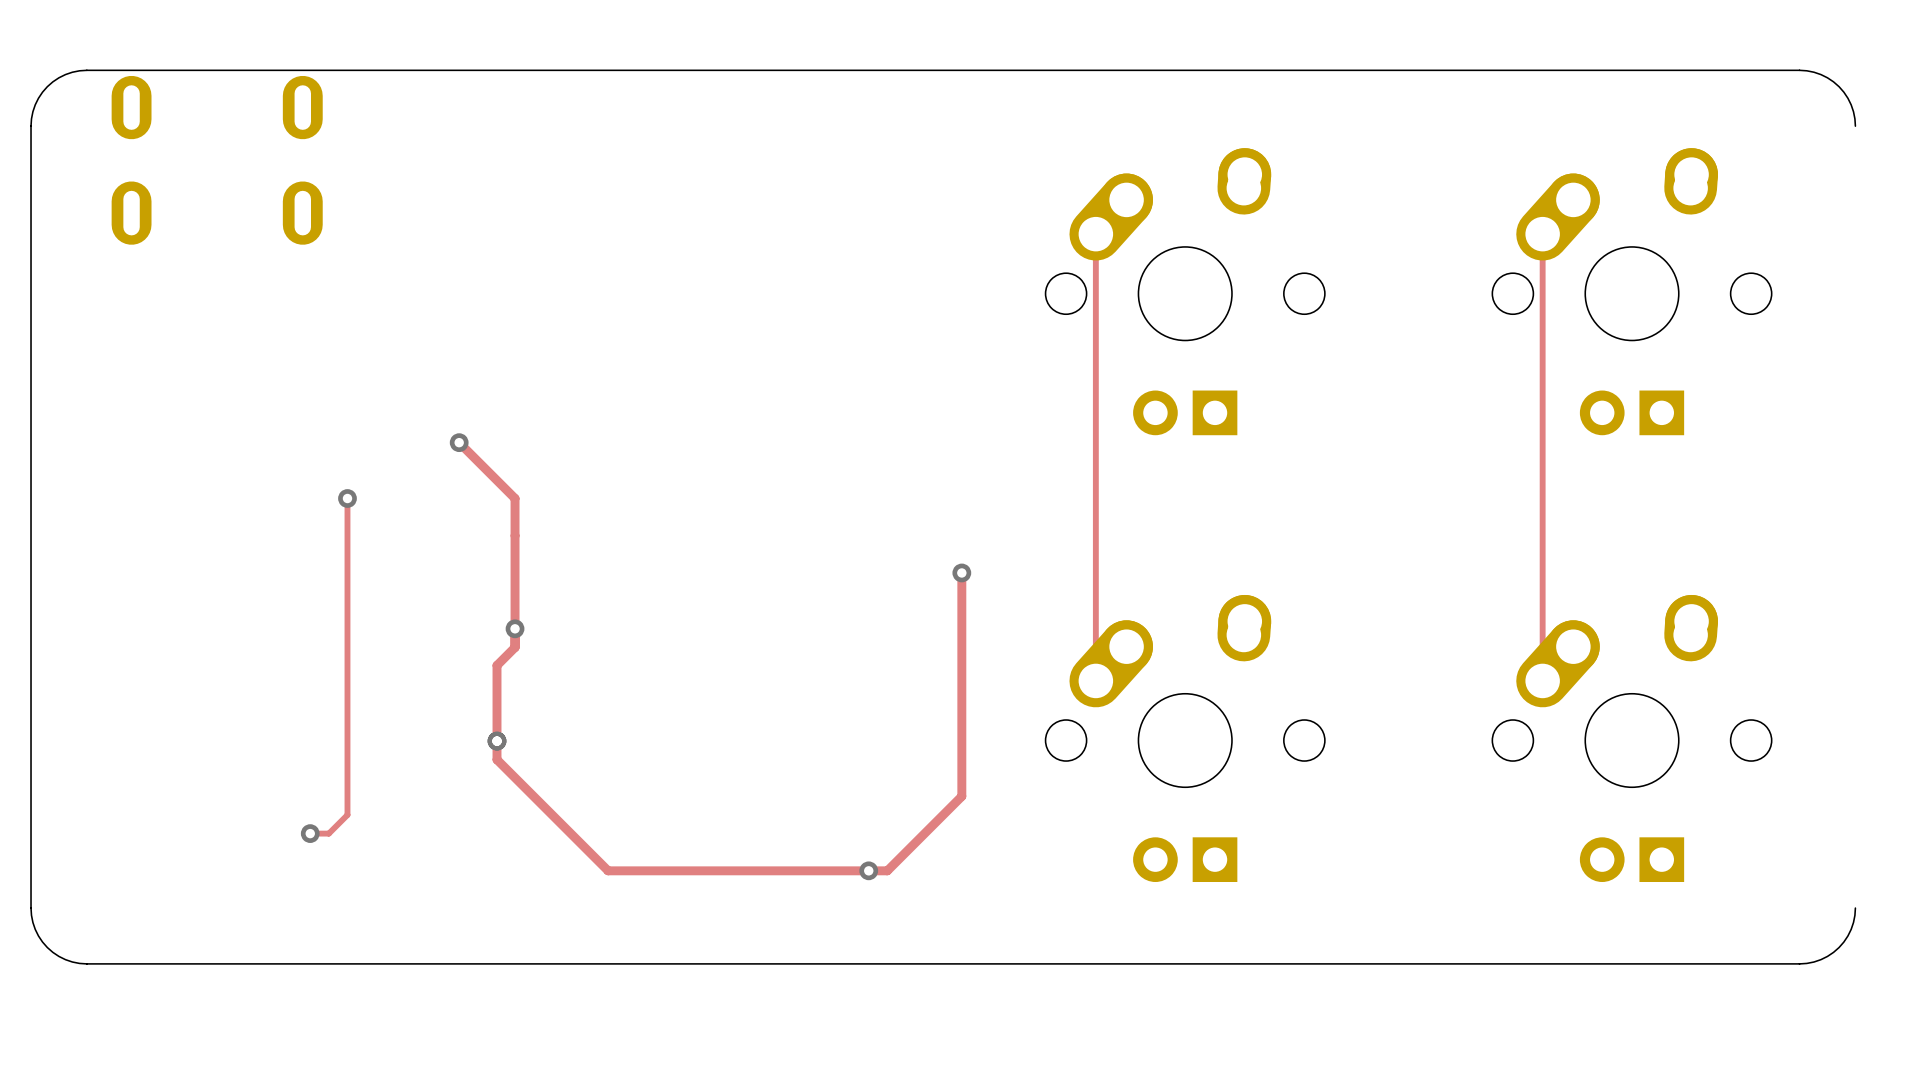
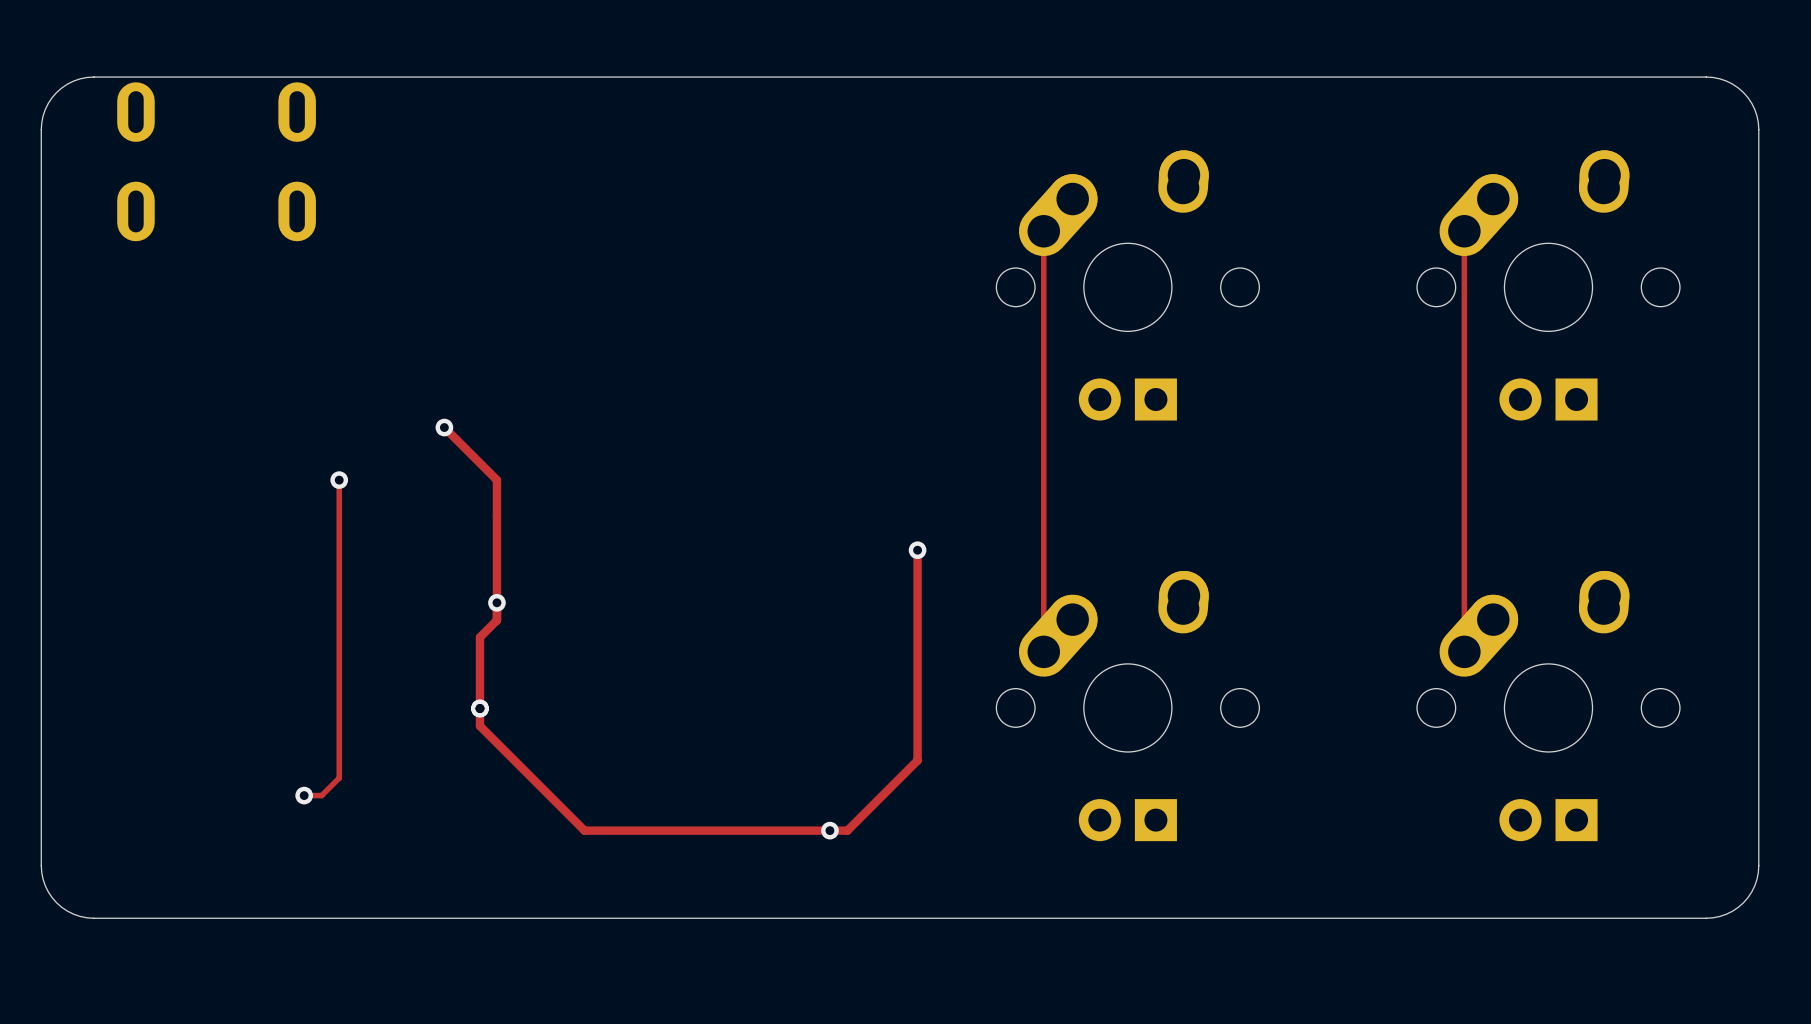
board edge: none -> (1758, 129) (1758, 865)

